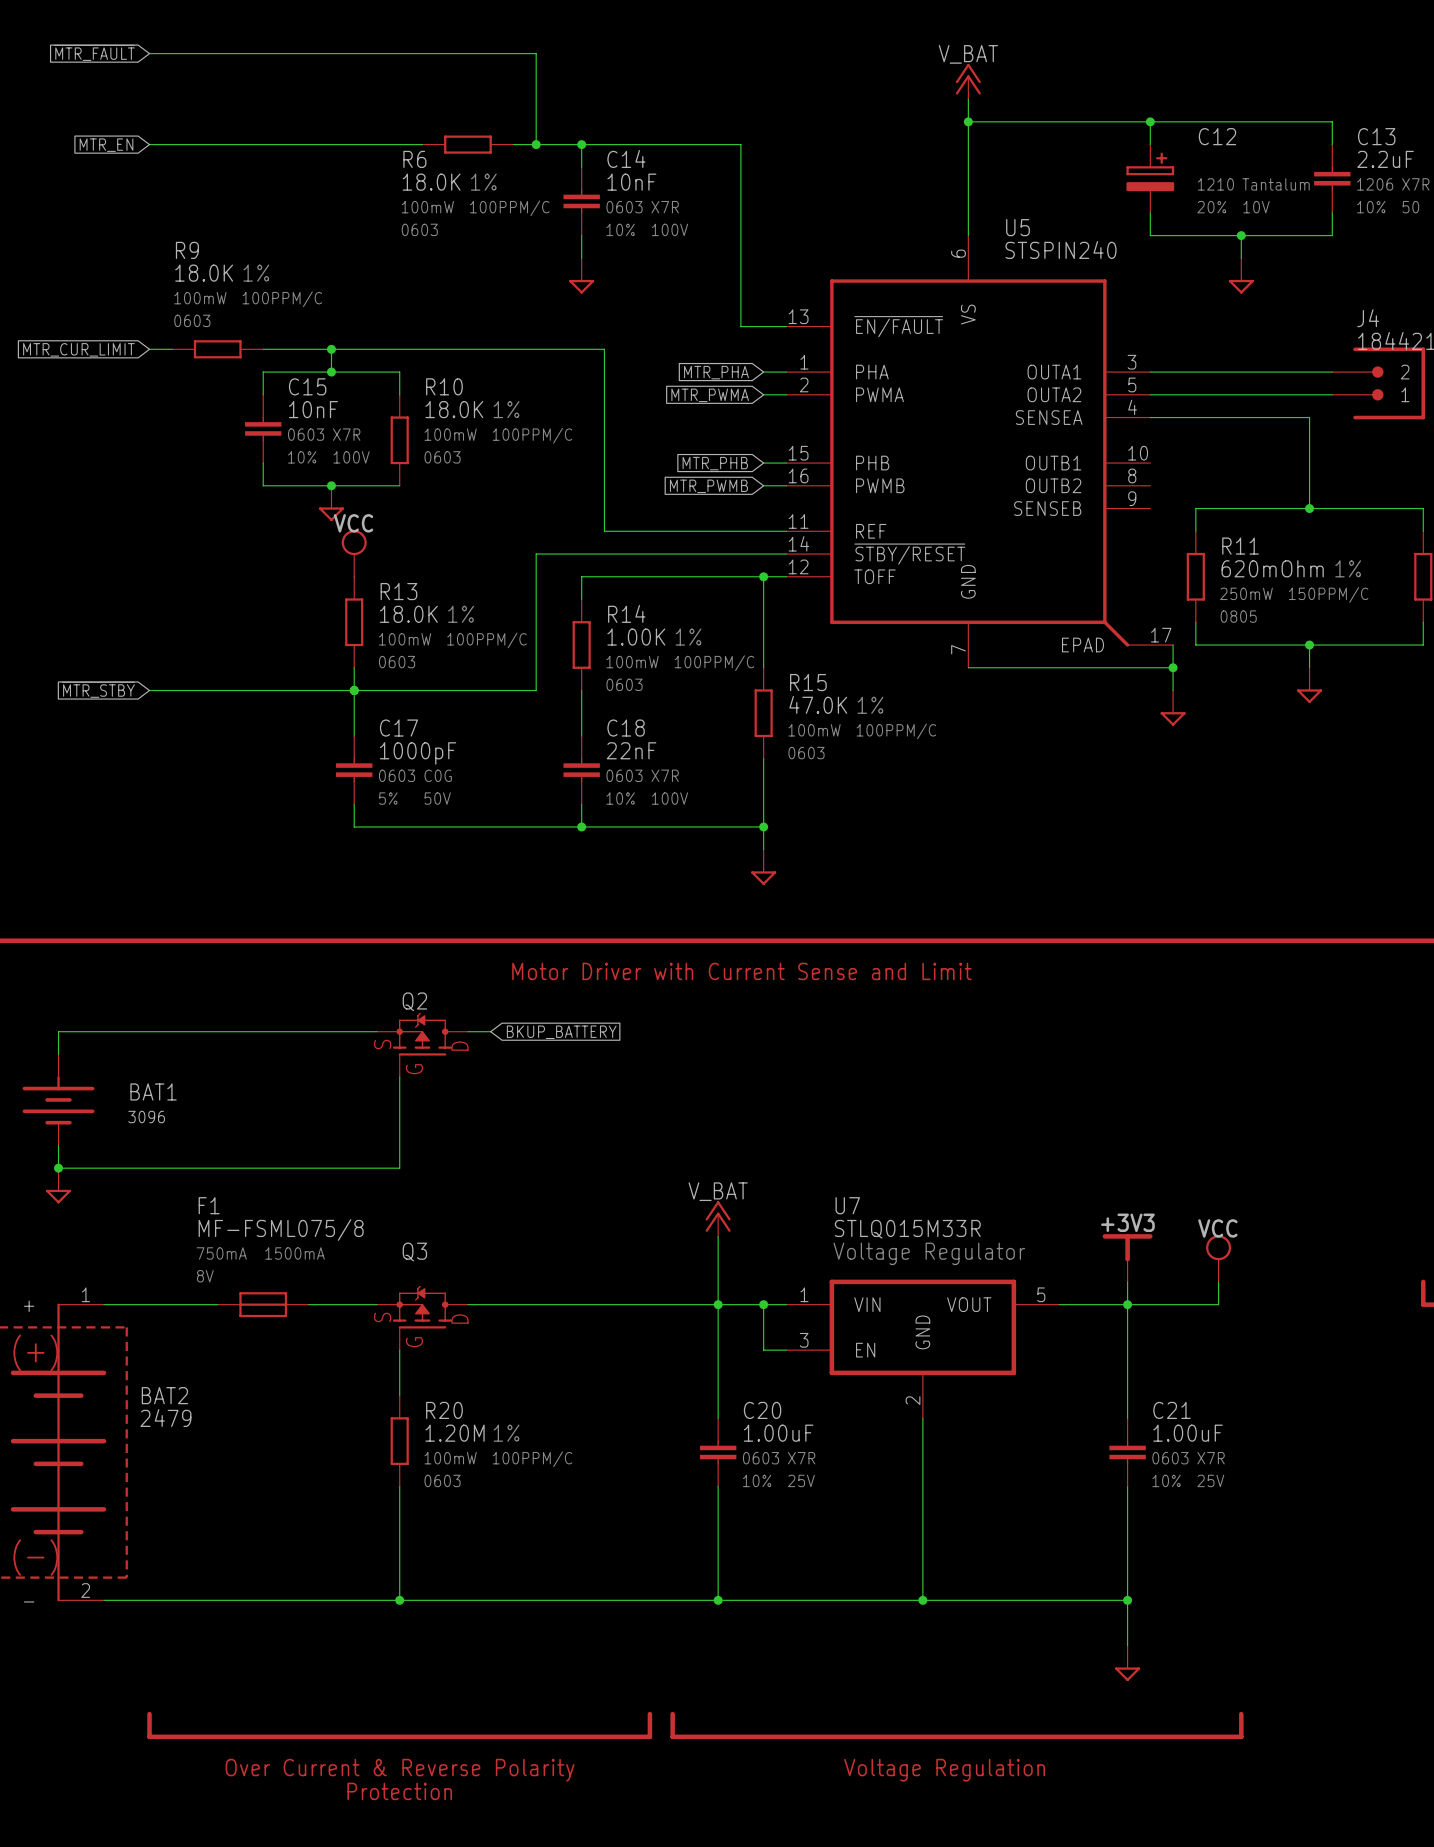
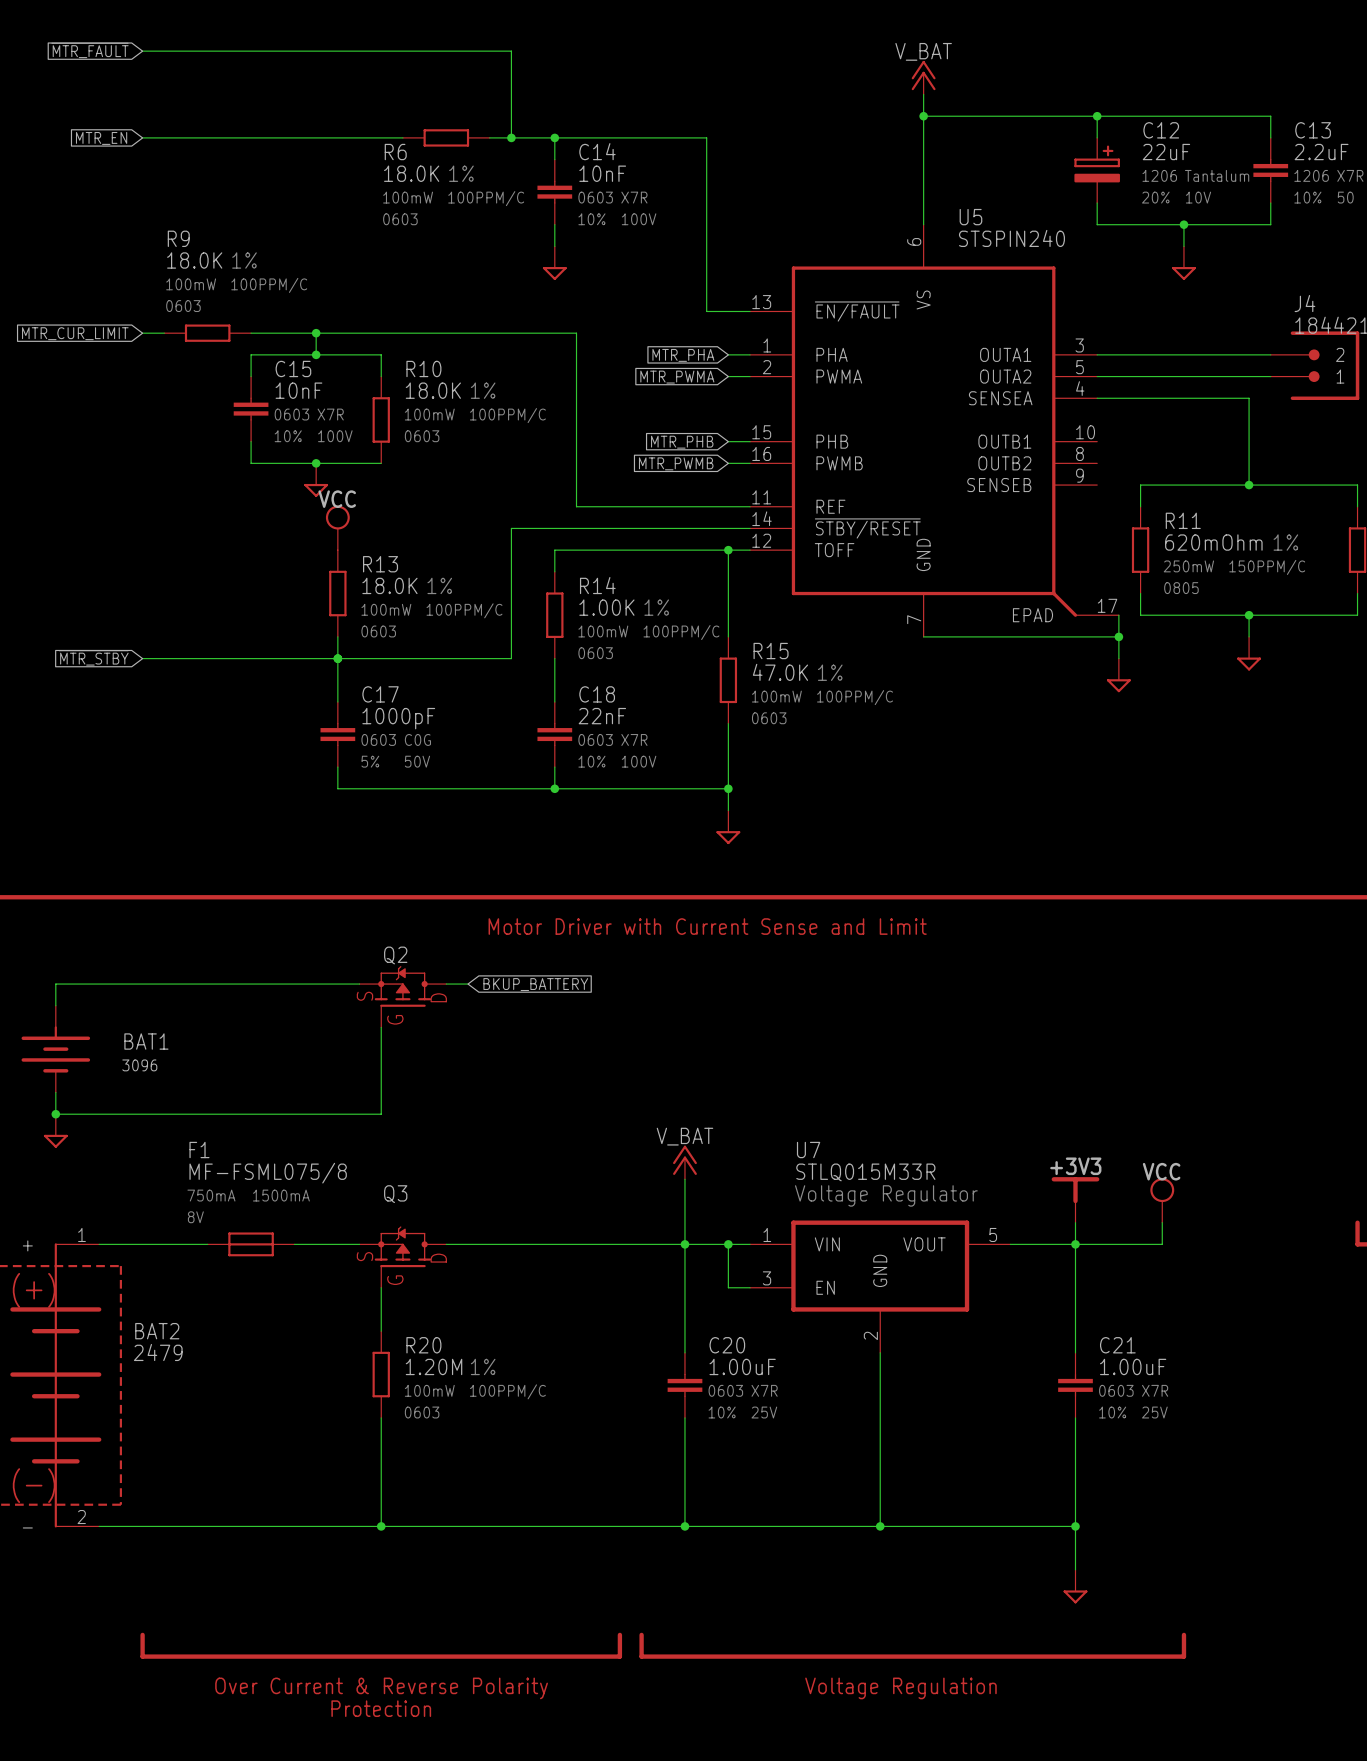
C12 value: none -> 22uF (1166, 152)
C12 text: 1210 (1215, 184) -> 1206 (1159, 175)

